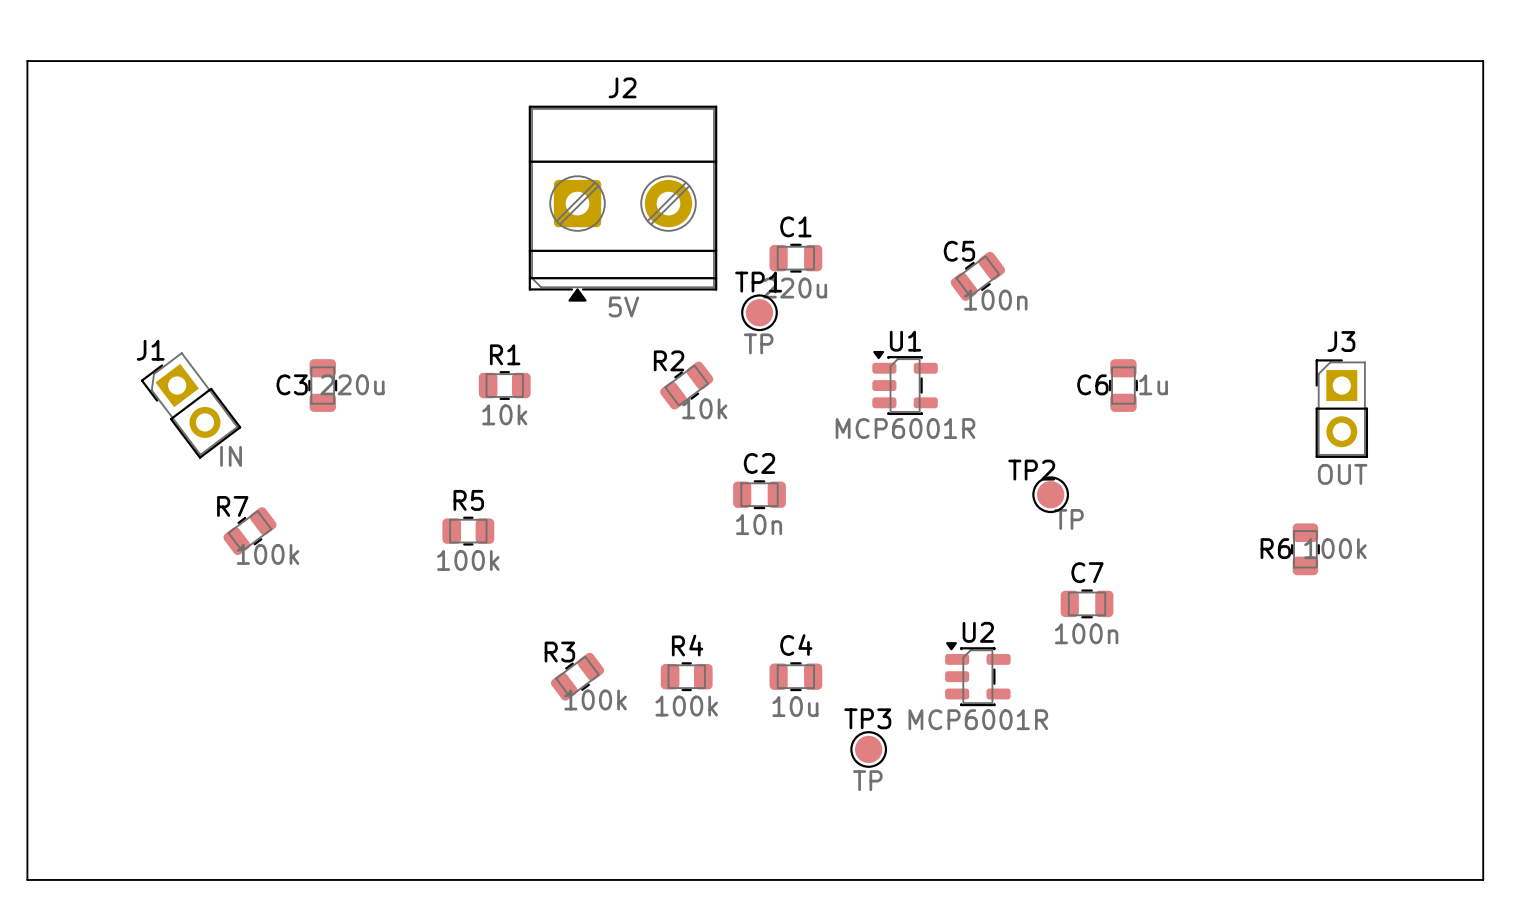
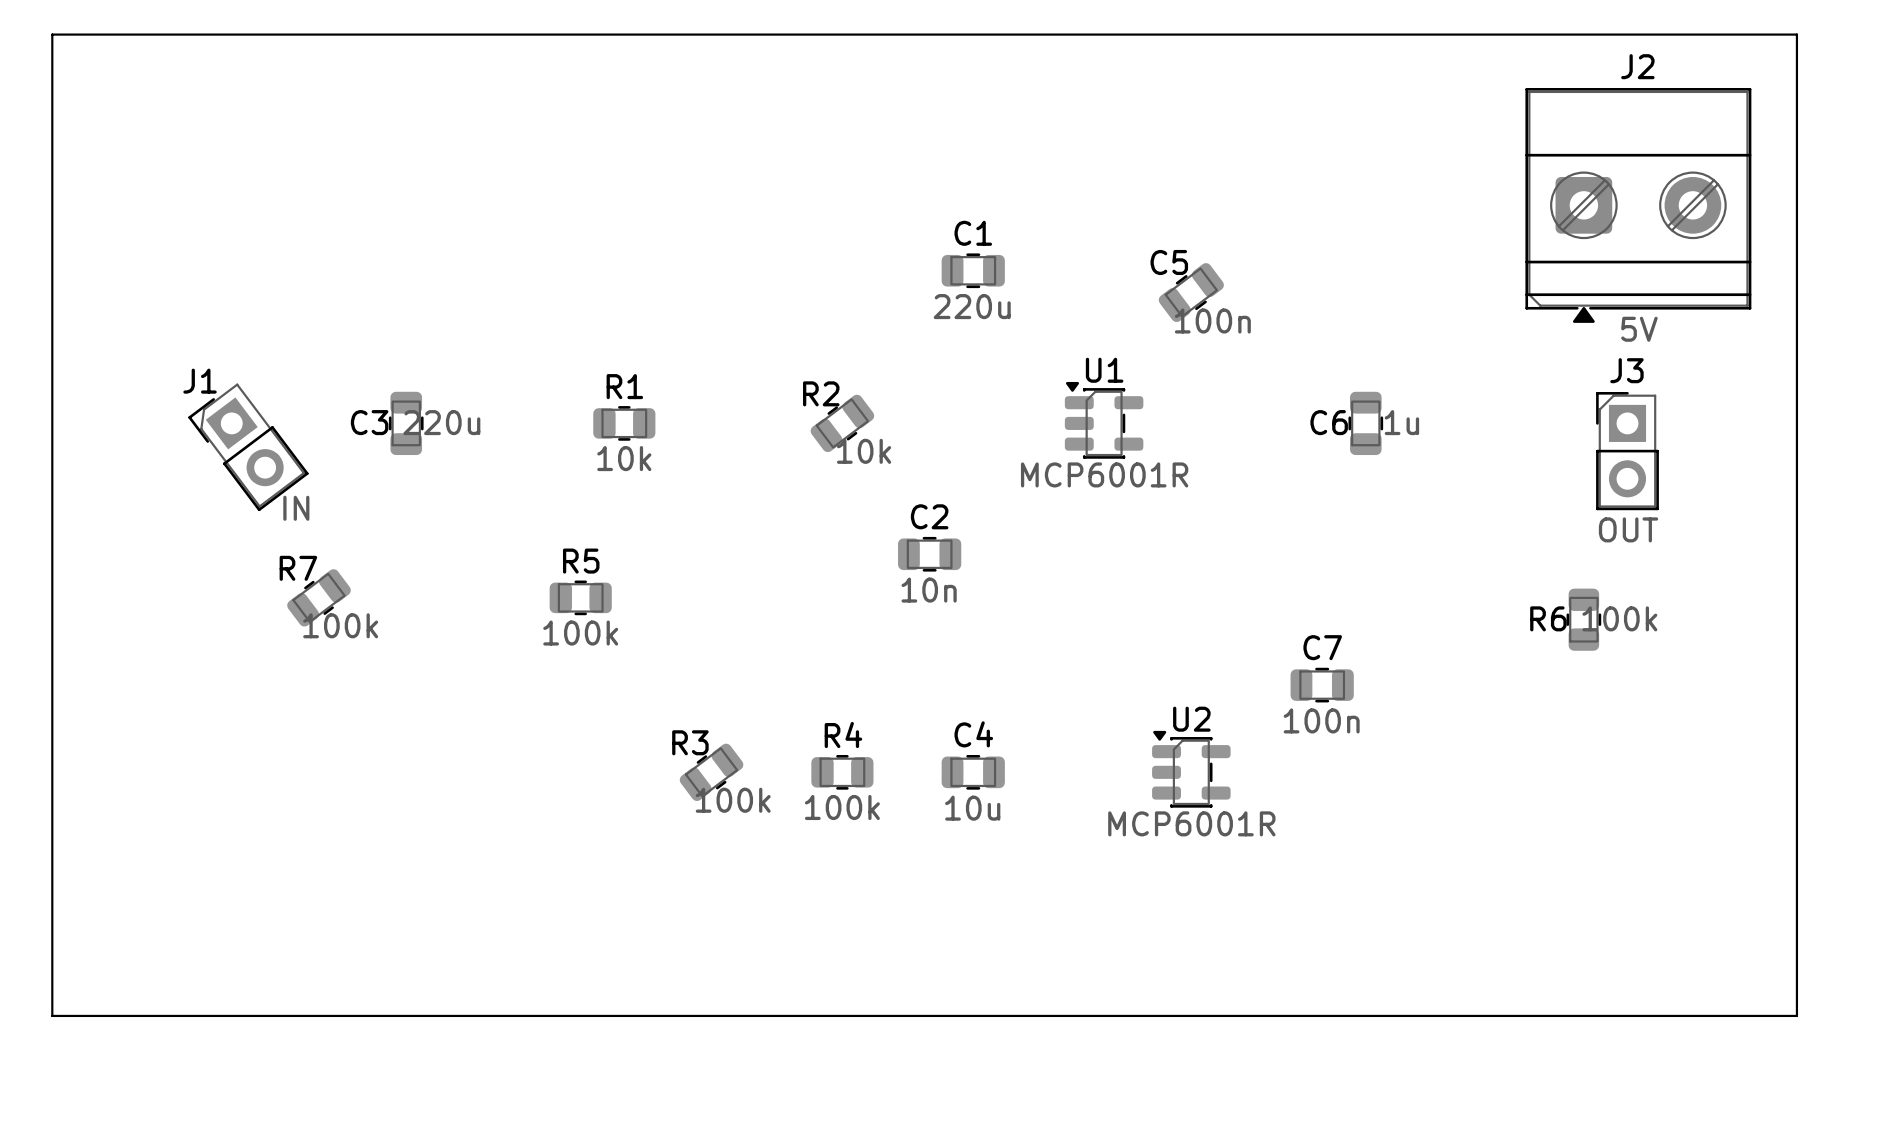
J2 position: (623, 203) -> (1638, 205)
TP1: TP (759, 312) -> none
TP2: TP (1050, 494) -> none
TP3: TP (868, 749) -> none

